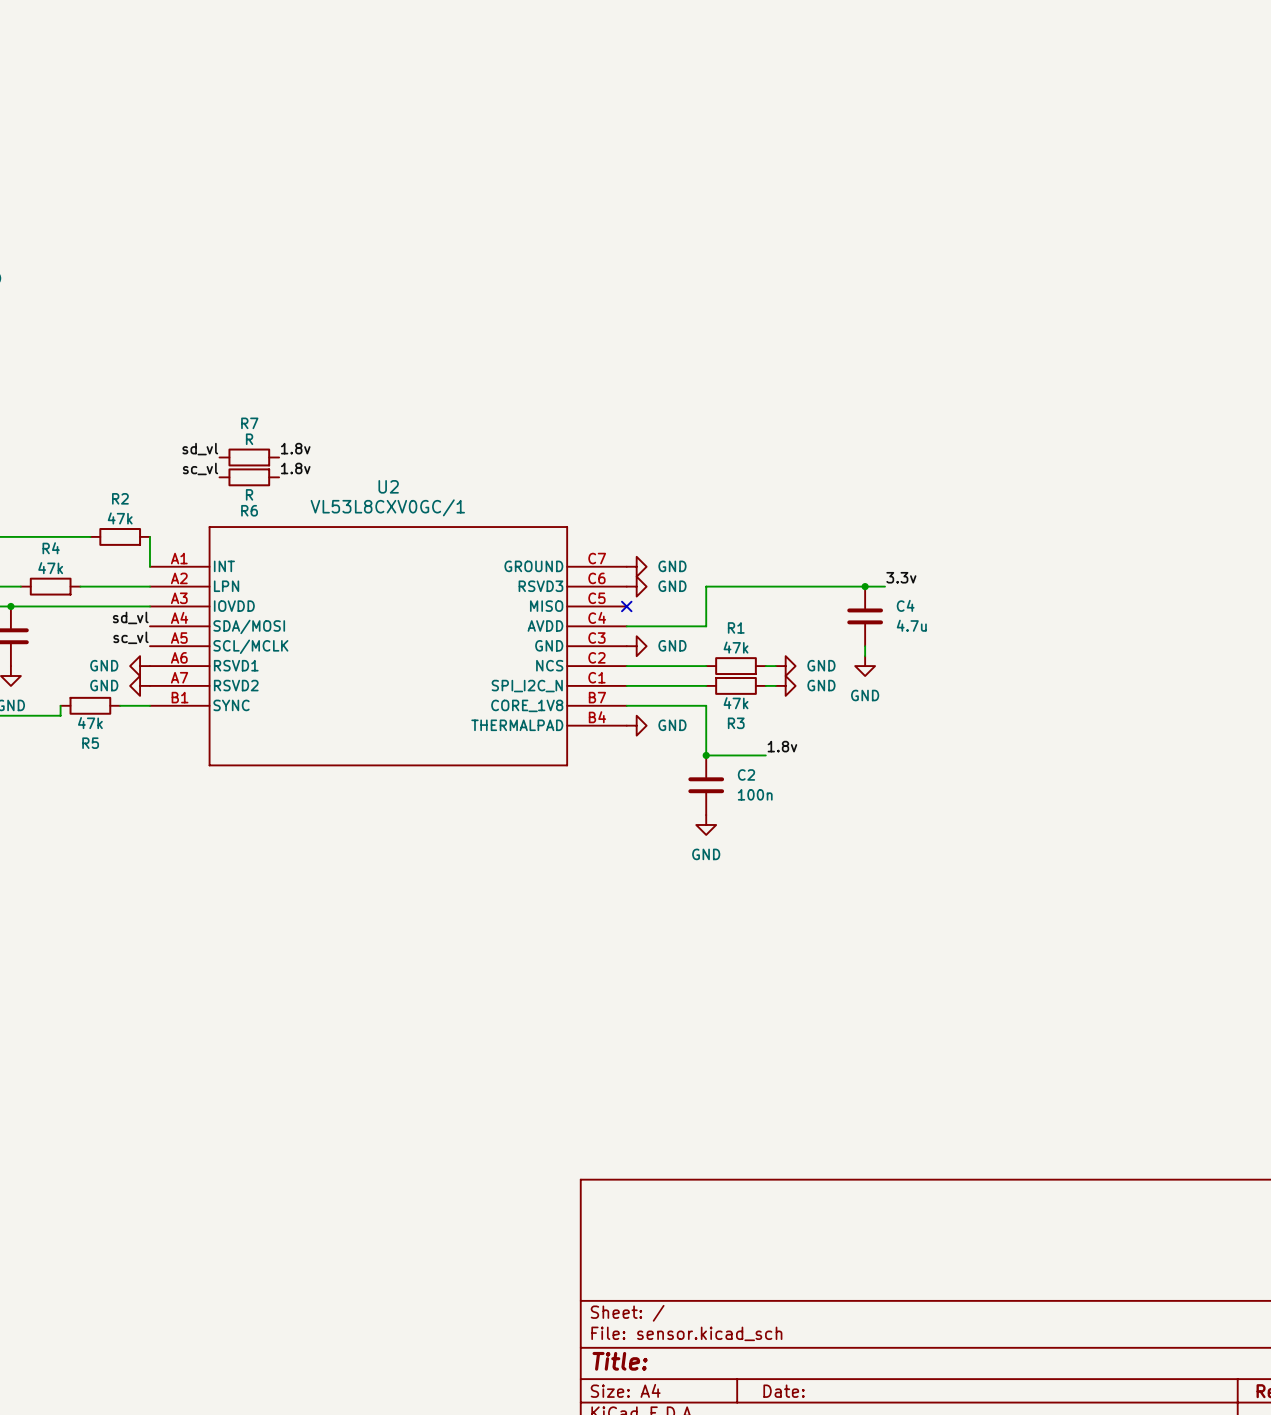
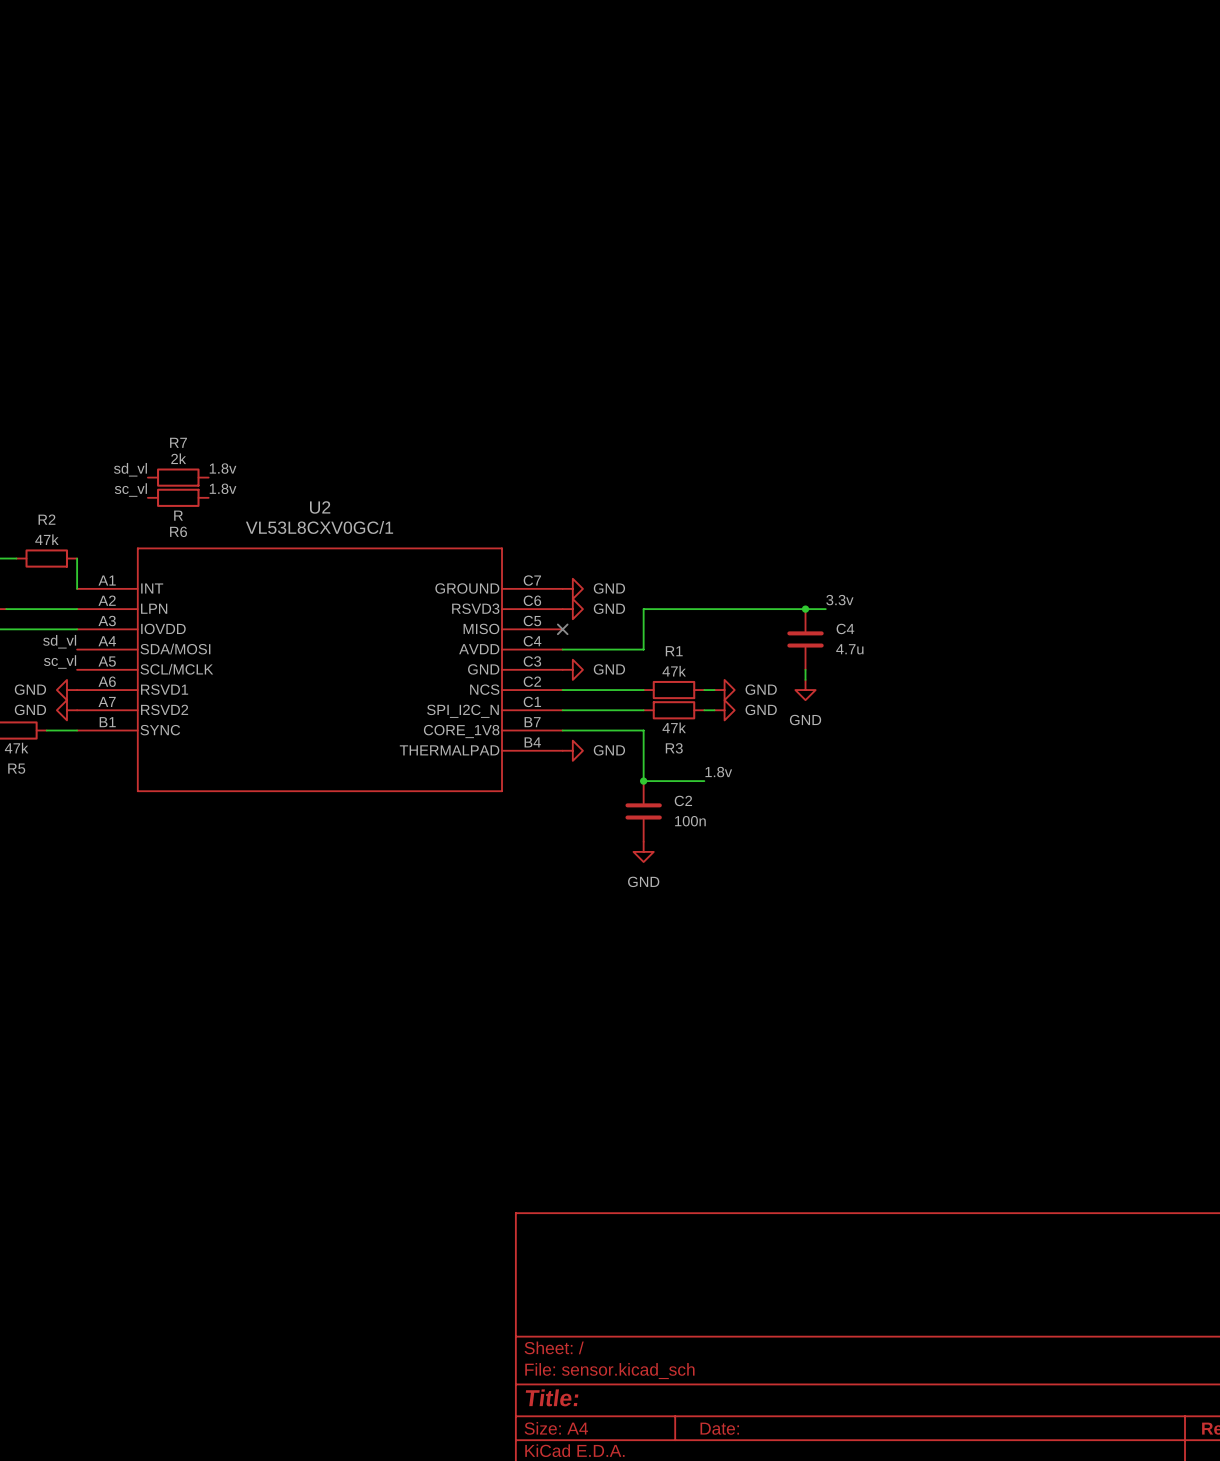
R7 value: R (249, 439) -> 2k (178, 458)

